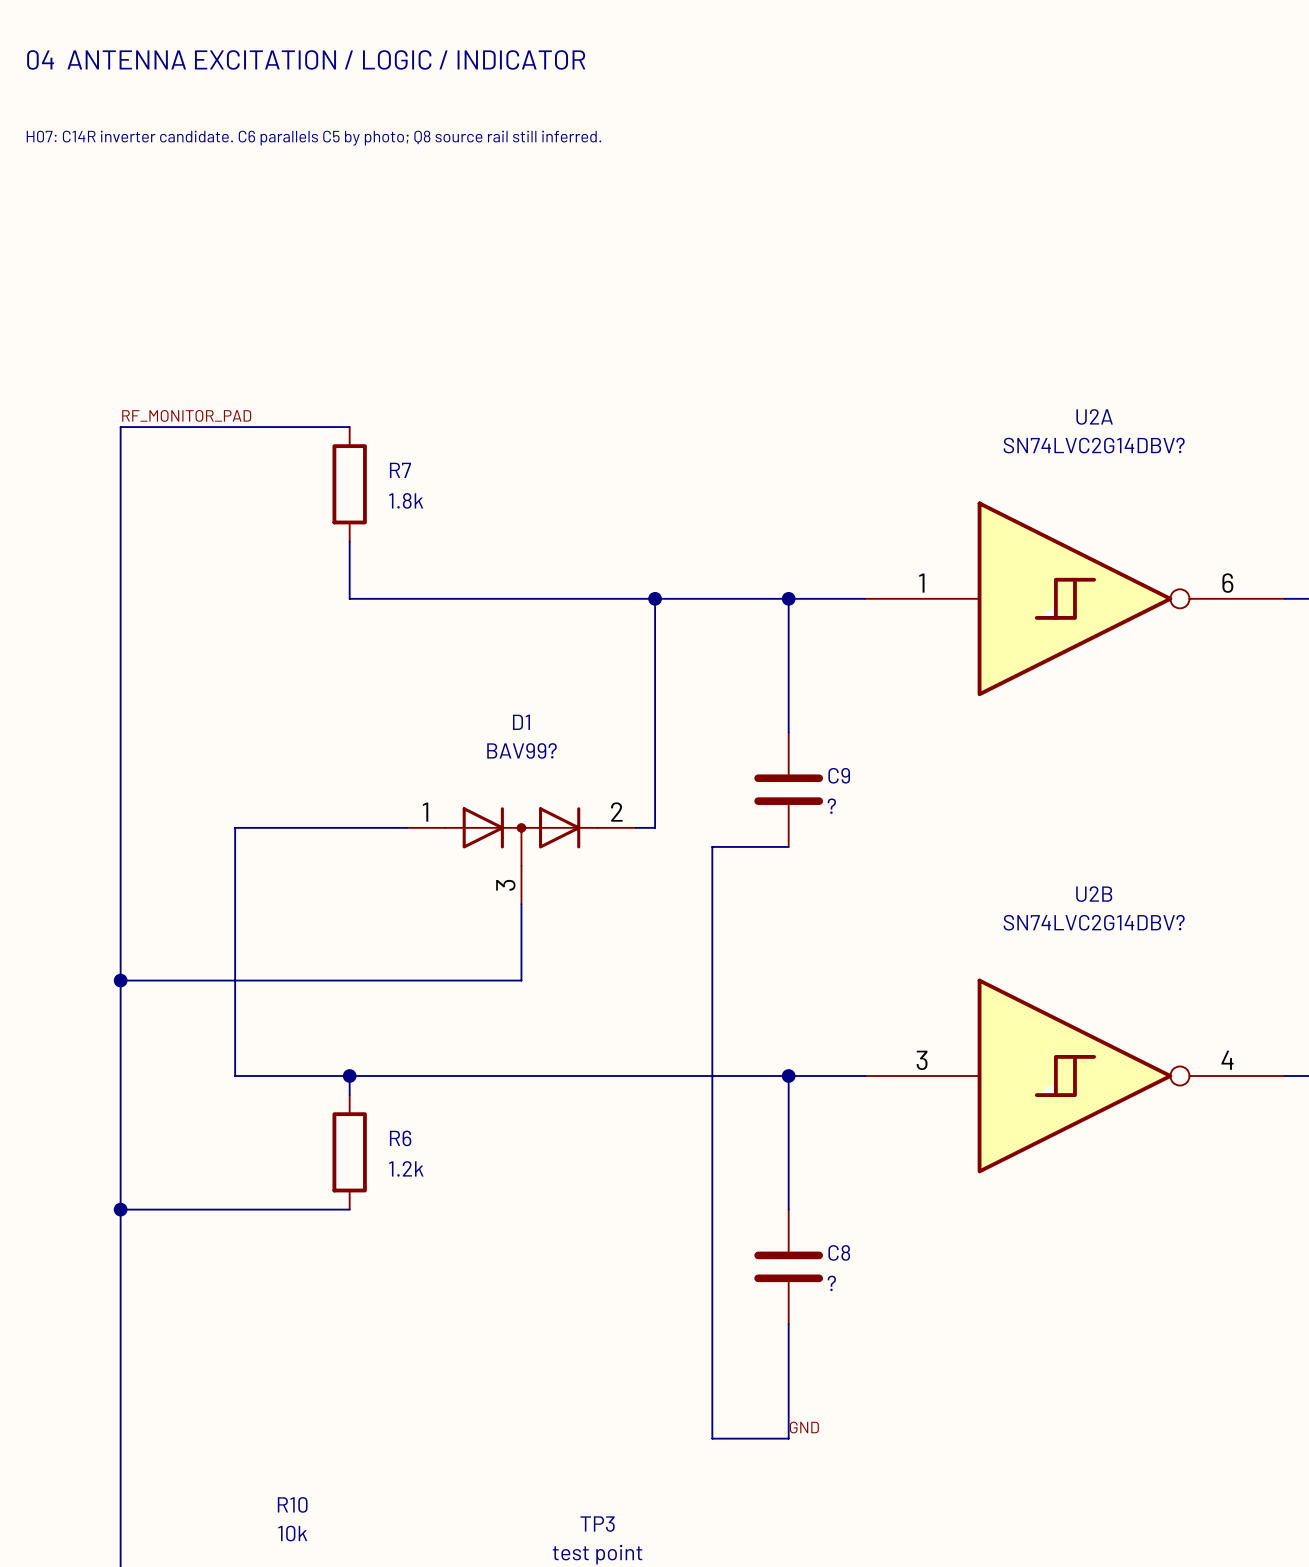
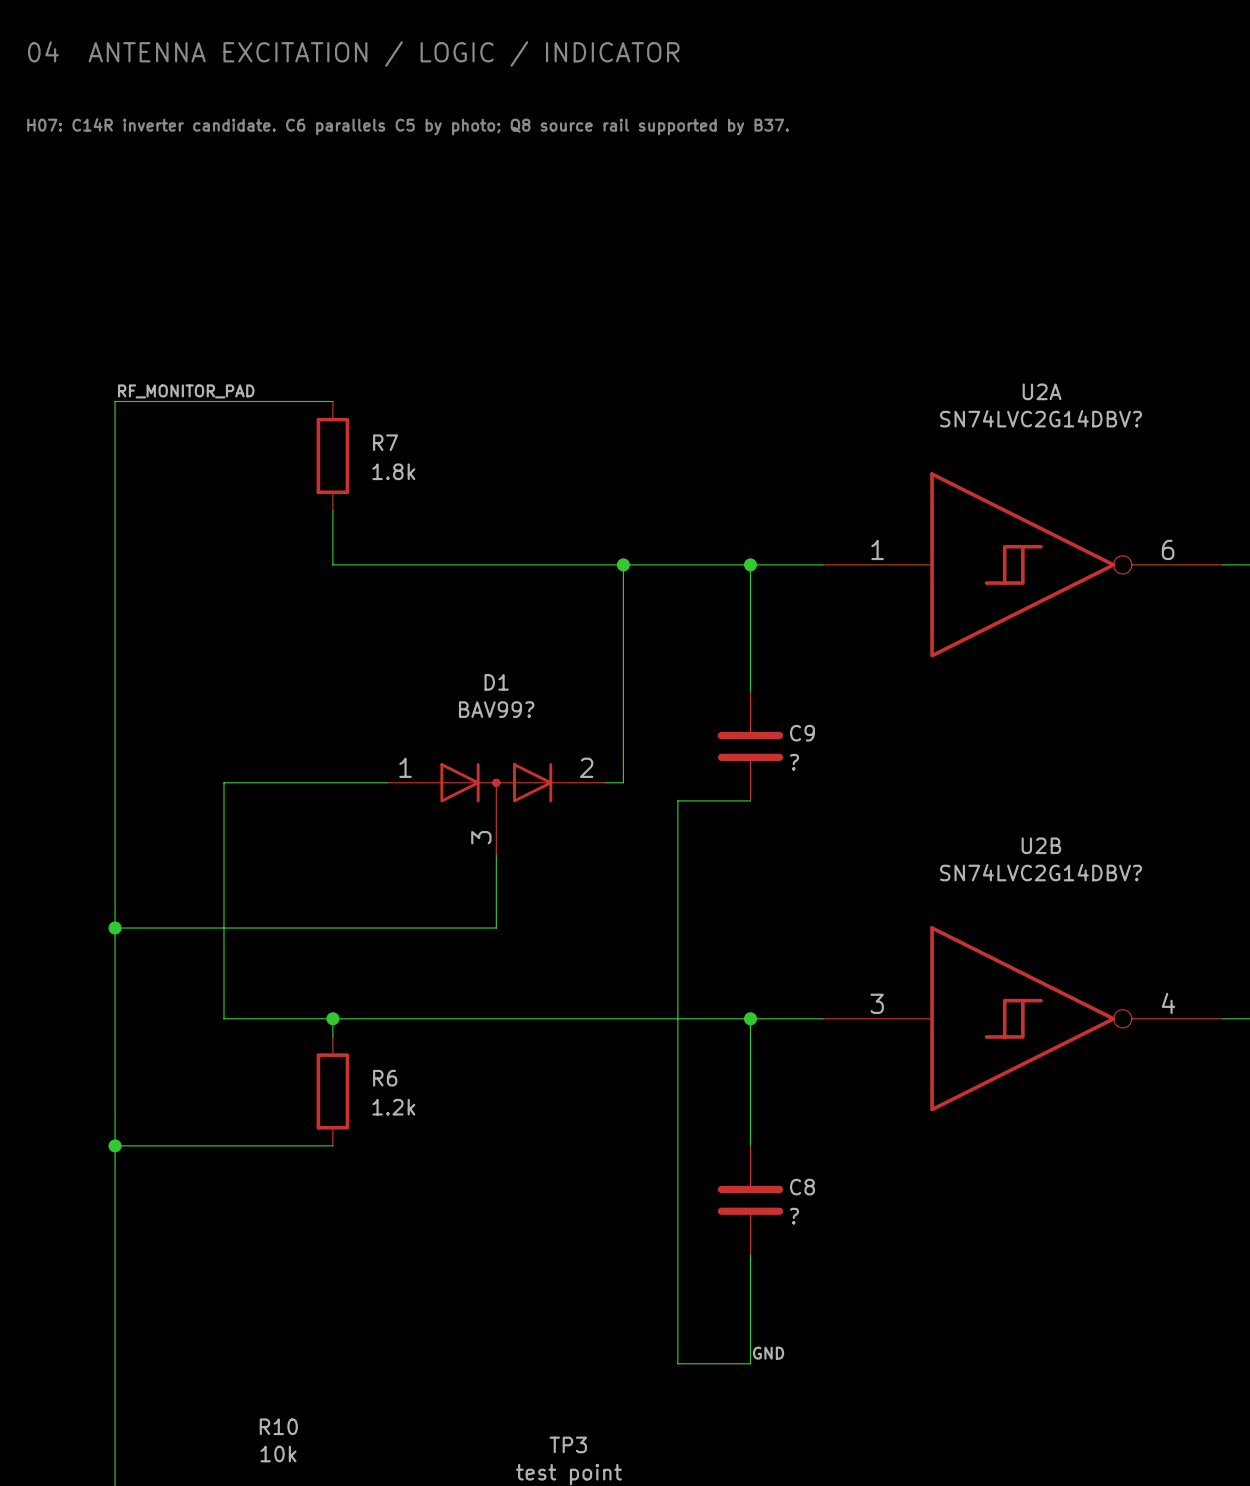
text: H07: C14R inverter candidate. C6 parallels C5 by photo; Q8 source rail still inferred. (313, 138) -> H07: C14R inverter candidate. C6 parallels C5 by photo; Q8 source rail supported by B37. (408, 126)

